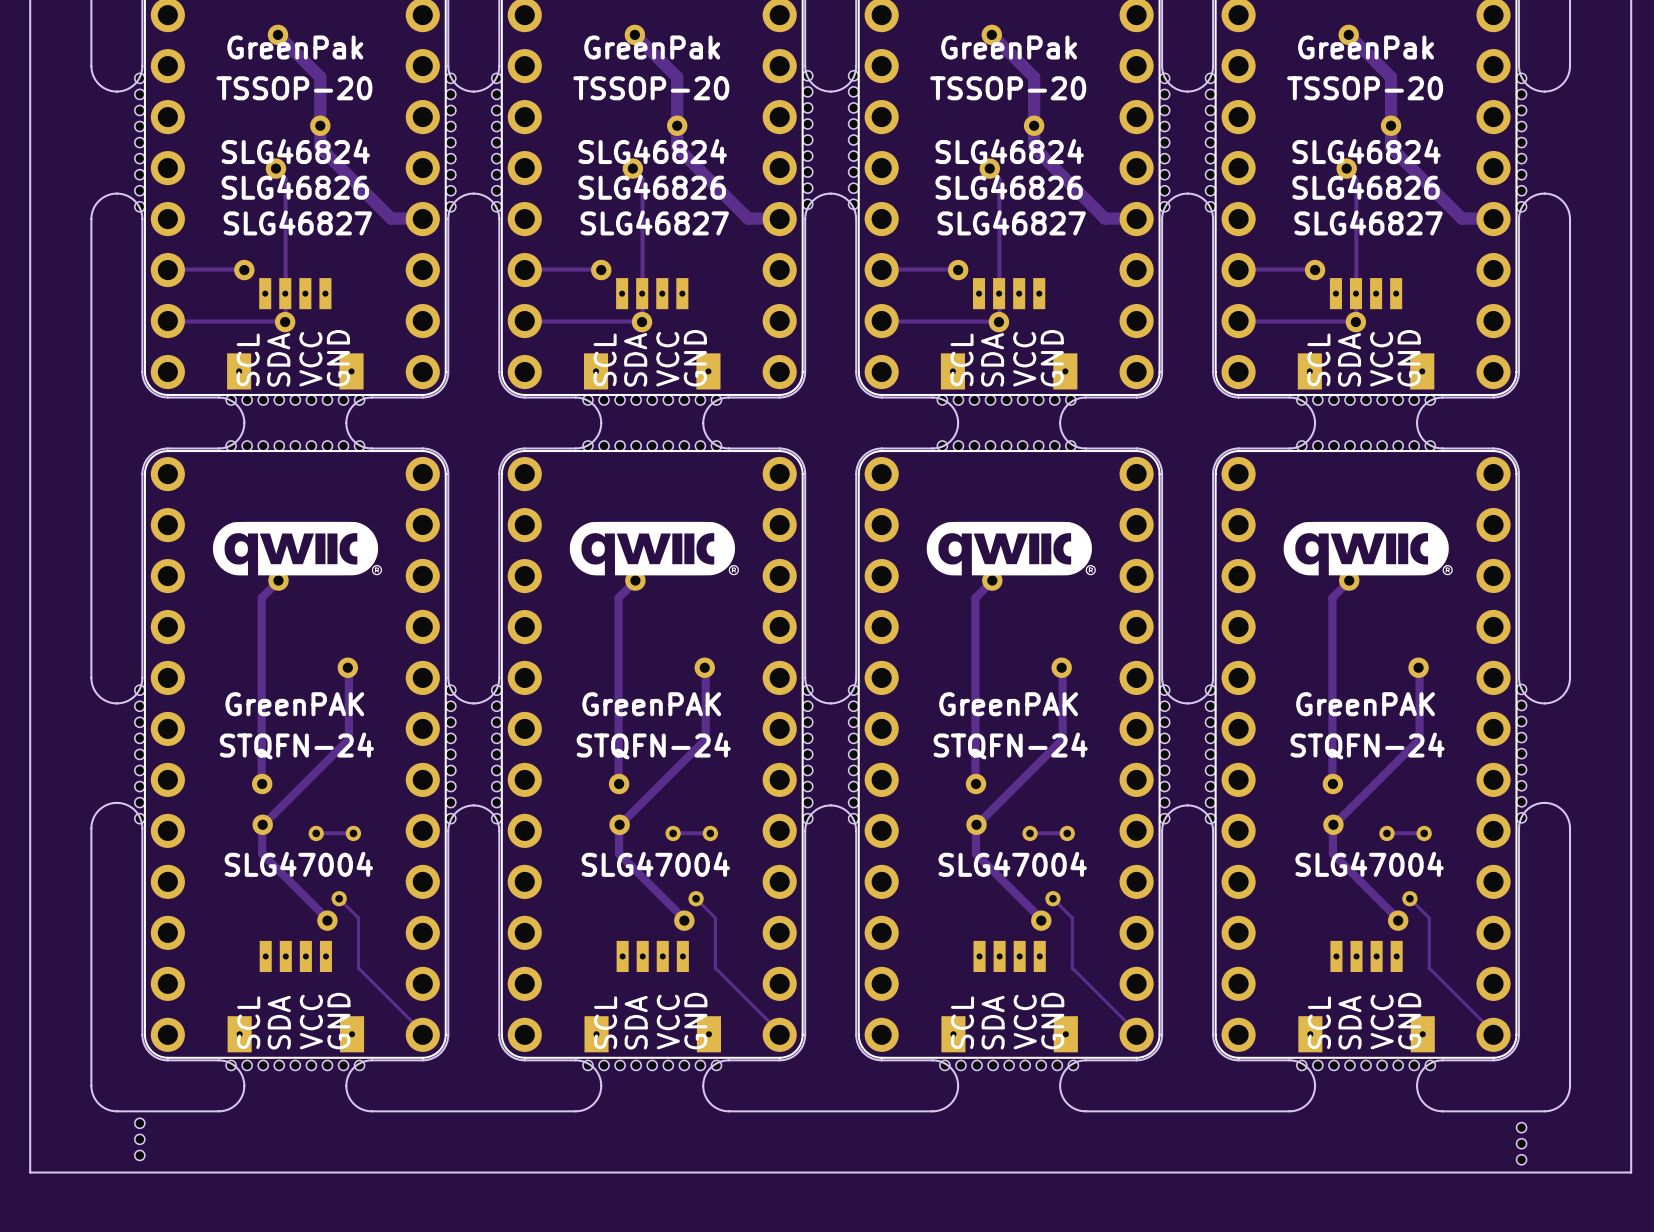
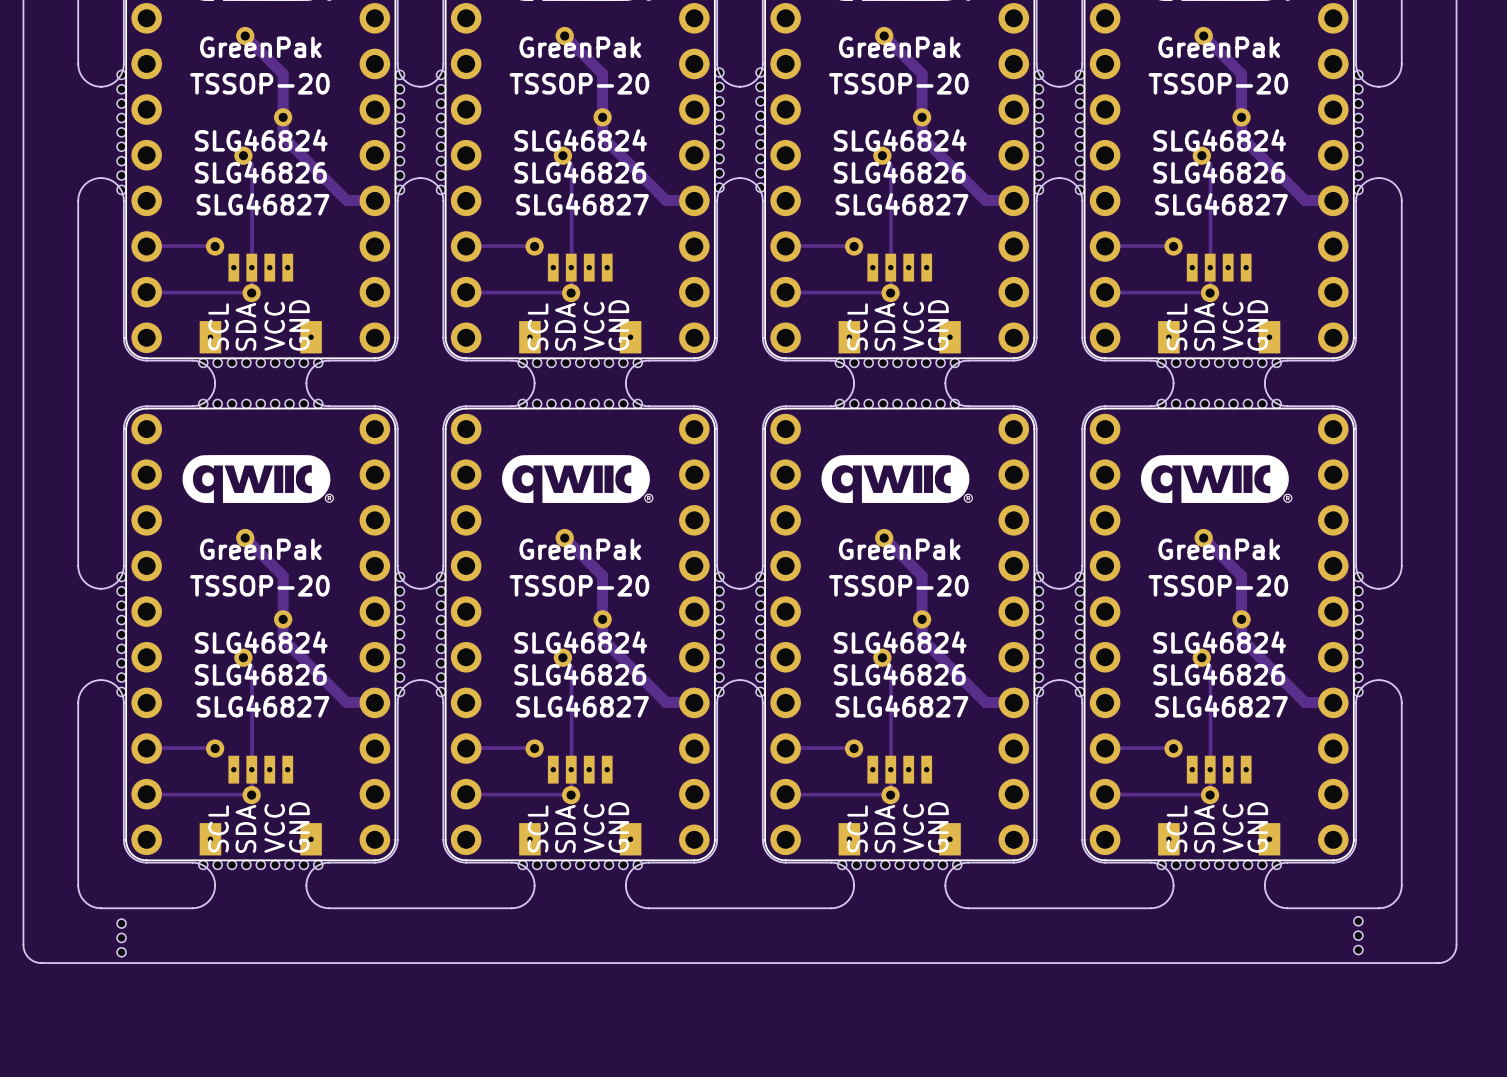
board edge: (142, 626) (140, 686) (130, 699) (116, 703) (100, 697) (92, 686) (91, 626) -> (123, 565) (122, 573) (117, 582) (110, 586) (101, 588) (91, 586) (84, 582) (79, 573) (78, 565)
board edge: (499, 626) (497, 686) (489, 697) (473, 703) (460, 699) (449, 686) (448, 626) -> (443, 565) (441, 575) (436, 582) (428, 587) (420, 588) (412, 587) (404, 582) (398, 573) (397, 565)
board edge: (856, 626) (854, 686) (846, 697) (830, 703) (814, 697) (806, 686) (805, 626) -> (762, 565) (761, 573) (756, 582) (747, 587) (739, 588) (732, 587) (723, 582) (719, 575) (717, 565)
board edge: (1213, 626) (1211, 686) (1203, 697) (1187, 703) (1171, 697) (1163, 686) (1162, 626) -> (1082, 565) (1081, 573) (1075, 582) (1069, 586) (1059, 588) (1051, 587) (1043, 582) (1037, 573) (1036, 565)
board edge: (1570, 626) (1568, 686) (1560, 697) (1544, 703) (1530, 699) (1520, 686) (1519, 626) -> (1401, 565) (1400, 573) (1395, 582) (1386, 587) (1378, 588) (1369, 586) (1362, 582) (1357, 573) (1356, 565)
part: none -> (260, 634)
part: none -> (580, 634)
part: none -> (899, 634)
part: none -> (1219, 634)
part position: (1521, 753) -> (1358, 634)
part position: (139, 754) -> (121, 634)
part: (295, 754) -> none
part position: (473, 754) -> (420, 634)
part: (652, 754) -> none
part position: (830, 754) -> (739, 634)
part: (1009, 754) -> none
part position: (1187, 754) -> (1059, 634)
part: (1366, 754) -> none
board edge: (142, 828) (140, 819) (134, 810) (127, 805) (116, 802) (108, 804) (98, 810) (92, 819) (91, 828) -> (123, 746) (122, 695) (115, 685) (101, 680) (86, 685) (79, 695) (78, 746)
board edge: (1570, 828) (1567, 817) (1562, 810) (1555, 805) (1544, 802) (1533, 805) (1526, 810) (1520, 819) (1519, 828) -> (1401, 746) (1400, 695) (1391, 683) (1378, 680) (1364, 685) (1357, 695) (1356, 746)
board edge: (499, 830) (496, 819) (491, 812) (484, 807) (473, 805) (465, 806) (455, 812) (449, 822) (448, 830) -> (443, 748) (442, 695) (434, 685) (420, 680) (408, 683) (398, 695) (397, 748)
board edge: (856, 830) (854, 822) (848, 812) (841, 807) (830, 805) (819, 807) (812, 812) (806, 822) (805, 830) -> (762, 748) (761, 695) (752, 683) (739, 680) (727, 683) (718, 695) (717, 748)
board edge: (1213, 830) (1211, 822) (1205, 812) (1198, 807) (1187, 805) (1176, 807) (1169, 812) (1163, 822) (1162, 830) -> (1082, 748) (1081, 695) (1073, 685) (1059, 680) (1047, 683) (1037, 695) (1036, 748)
board edge: (142, 932) (142, 1034) (146, 1048) (154, 1056) (162, 1059) (221, 1060) (232, 1064) (240, 1072) (244, 1082) (242, 1094) (236, 1103) (229, 1108) (218, 1111) (116, 1111) (100, 1105) (95, 1099) (91, 1088) (91, 983) -> (123, 839) (127, 851) (139, 861) (194, 862) (204, 866) (210, 871) (214, 880) (214, 890) (211, 897) (204, 904) (194, 908) (98, 908) (88, 904) (83, 899) (78, 885)
board edge: (499, 932) (499, 1034) (503, 1048) (508, 1054) (519, 1059) (578, 1060) (589, 1064) (595, 1069) (600, 1080) (600, 1091) (595, 1101) (586, 1108) (575, 1111) (371, 1111) (360, 1108) (350, 1099) (346, 1088) (348, 1074) (355, 1065) (368, 1060) (428, 1059) (438, 1054) (445, 1045) (448, 1034) (448, 932) -> (443, 839) (448, 854) (458, 861) (514, 862) (523, 866) (529, 871) (534, 880) (534, 890) (531, 897) (523, 904) (511, 908) (329, 908) (317, 904) (309, 897) (306, 890) (306, 880) (311, 871) (317, 866) (326, 862) (382, 861) (394, 851) (397, 839)
board edge: (856, 932) (856, 1034) (860, 1048) (865, 1054) (876, 1059) (935, 1060) (946, 1064) (954, 1072) (957, 1080) (957, 1091) (952, 1101) (943, 1108) (932, 1111) (728, 1111) (717, 1108) (707, 1099) (703, 1088) (705, 1074) (712, 1065) (725, 1060) (785, 1059) (795, 1054) (802, 1045) (805, 1034) (805, 932) -> (762, 839) (766, 851) (778, 861) (833, 862) (843, 866) (850, 873) (853, 880) (853, 890) (850, 897) (843, 904) (831, 908) (648, 908) (636, 904) (629, 897) (626, 890) (626, 880) (629, 873) (636, 866) (646, 862) (701, 861) (713, 851) (717, 839)
board edge: (1213, 932) (1213, 1034) (1217, 1048) (1225, 1056) (1232, 1059) (1292, 1060) (1303, 1064) (1311, 1072) (1314, 1080) (1314, 1091) (1309, 1101) (1300, 1108) (1289, 1111) (1085, 1111) (1074, 1108) (1064, 1099) (1060, 1088) (1062, 1074) (1069, 1065) (1082, 1060) (1142, 1059) (1152, 1054) (1159, 1045) (1162, 1034) (1162, 932) -> (1082, 839) (1085, 851) (1097, 861) (1153, 862) (1162, 866) (1170, 873) (1172, 880) (1172, 890) (1170, 897) (1162, 904) (1150, 908) (968, 908) (956, 904) (948, 897) (945, 890) (945, 880) (950, 871) (956, 866) (965, 862) (1021, 861) (1033, 851) (1036, 839)
board edge: (1519, 932) (1519, 1034) (1515, 1048) (1509, 1054) (1499, 1059) (1439, 1060) (1428, 1064) (1420, 1072) (1417, 1082) (1418, 1094) (1424, 1103) (1434, 1109) (1442, 1111) (1544, 1111) (1560, 1105) (1567, 1096) (1569, 1088) (1570, 983) -> (1356, 839) (1351, 854) (1340, 861) (1285, 862) (1275, 866) (1269, 871) (1265, 880) (1265, 890) (1268, 897) (1275, 904) (1285, 908) (1381, 908) (1388, 906) (1396, 899) (1401, 885)
board edge: (1631, 1050) (1631, 1172) (30, 1172) (30, 1050) -> (1456, 945) (1451, 957) (1438, 963) (41, 963) (28, 957) (23, 945)
part position: (295, 1065) -> (260, 864)
part position: (652, 1065) -> (580, 864)
part position: (1009, 1065) -> (899, 864)
part position: (1366, 1065) -> (1219, 864)
part position: (139, 1139) -> (121, 937)
part position: (1521, 1143) -> (1358, 935)

